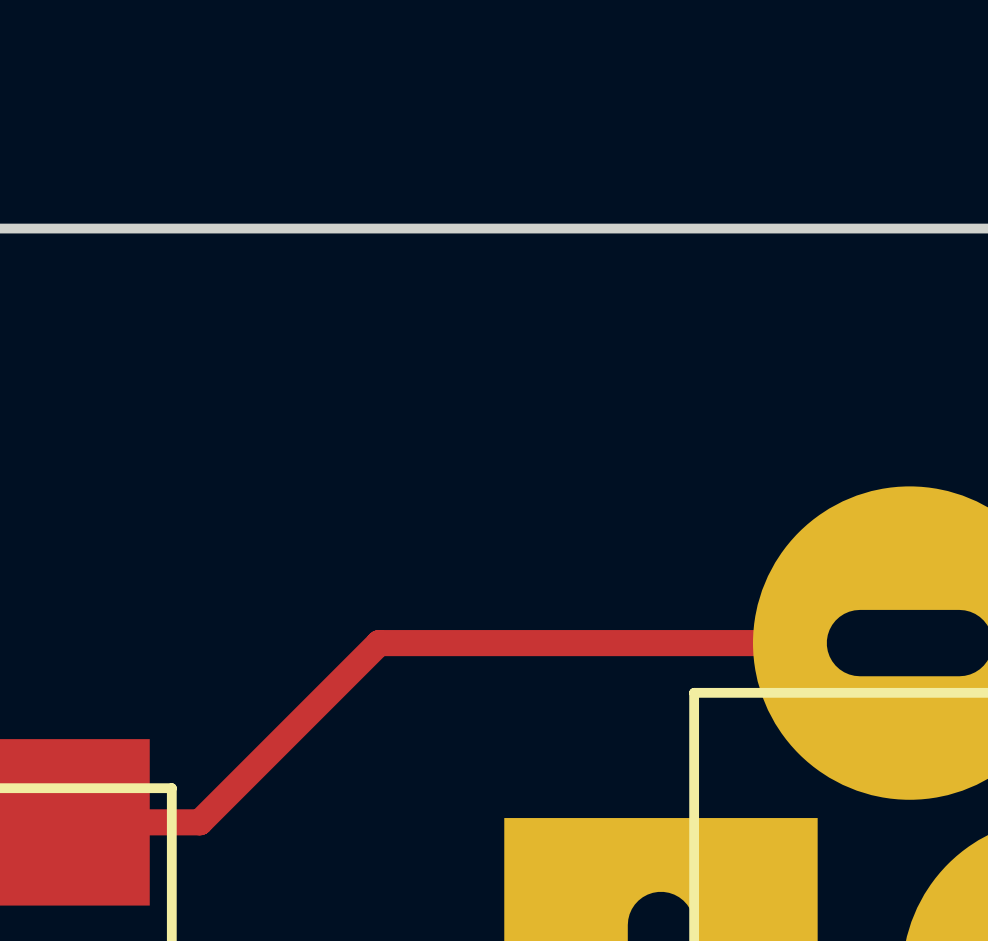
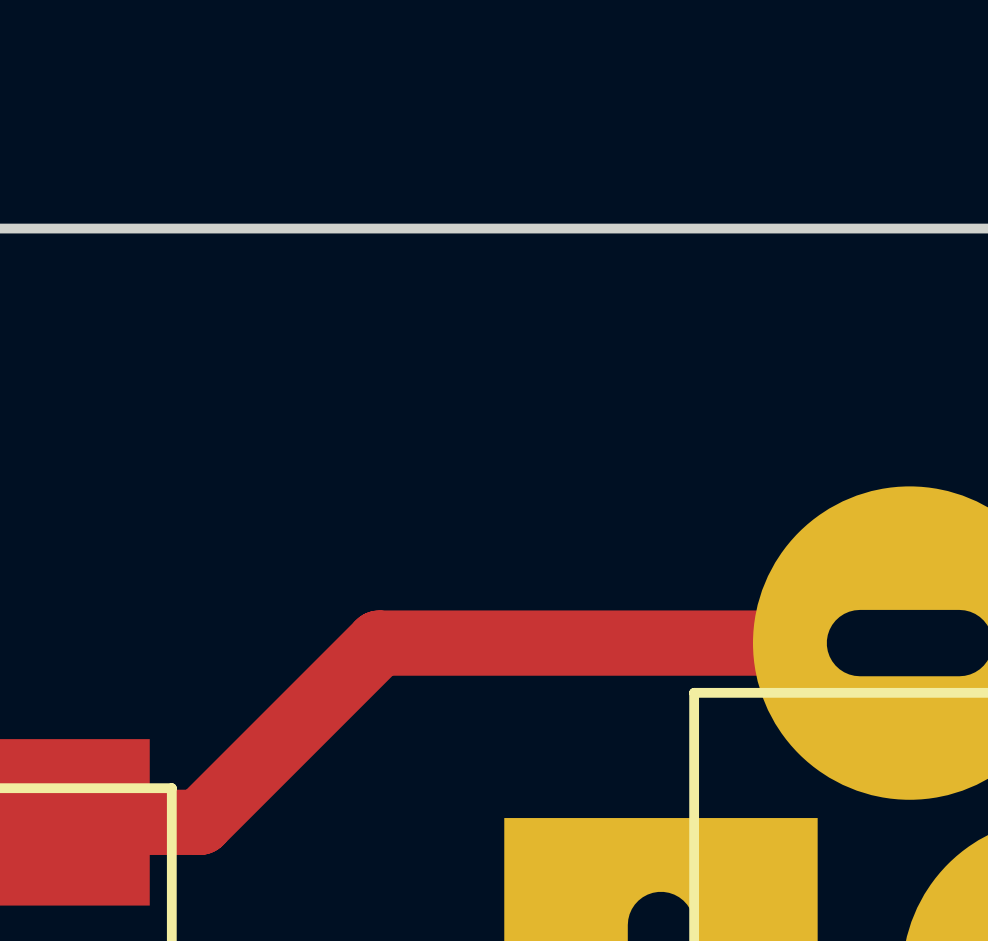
top track width: thin (909, 643) (379, 643) (199, 822) (68, 822) -> thick (909, 643) (379, 643) (199, 822) (68, 822)

